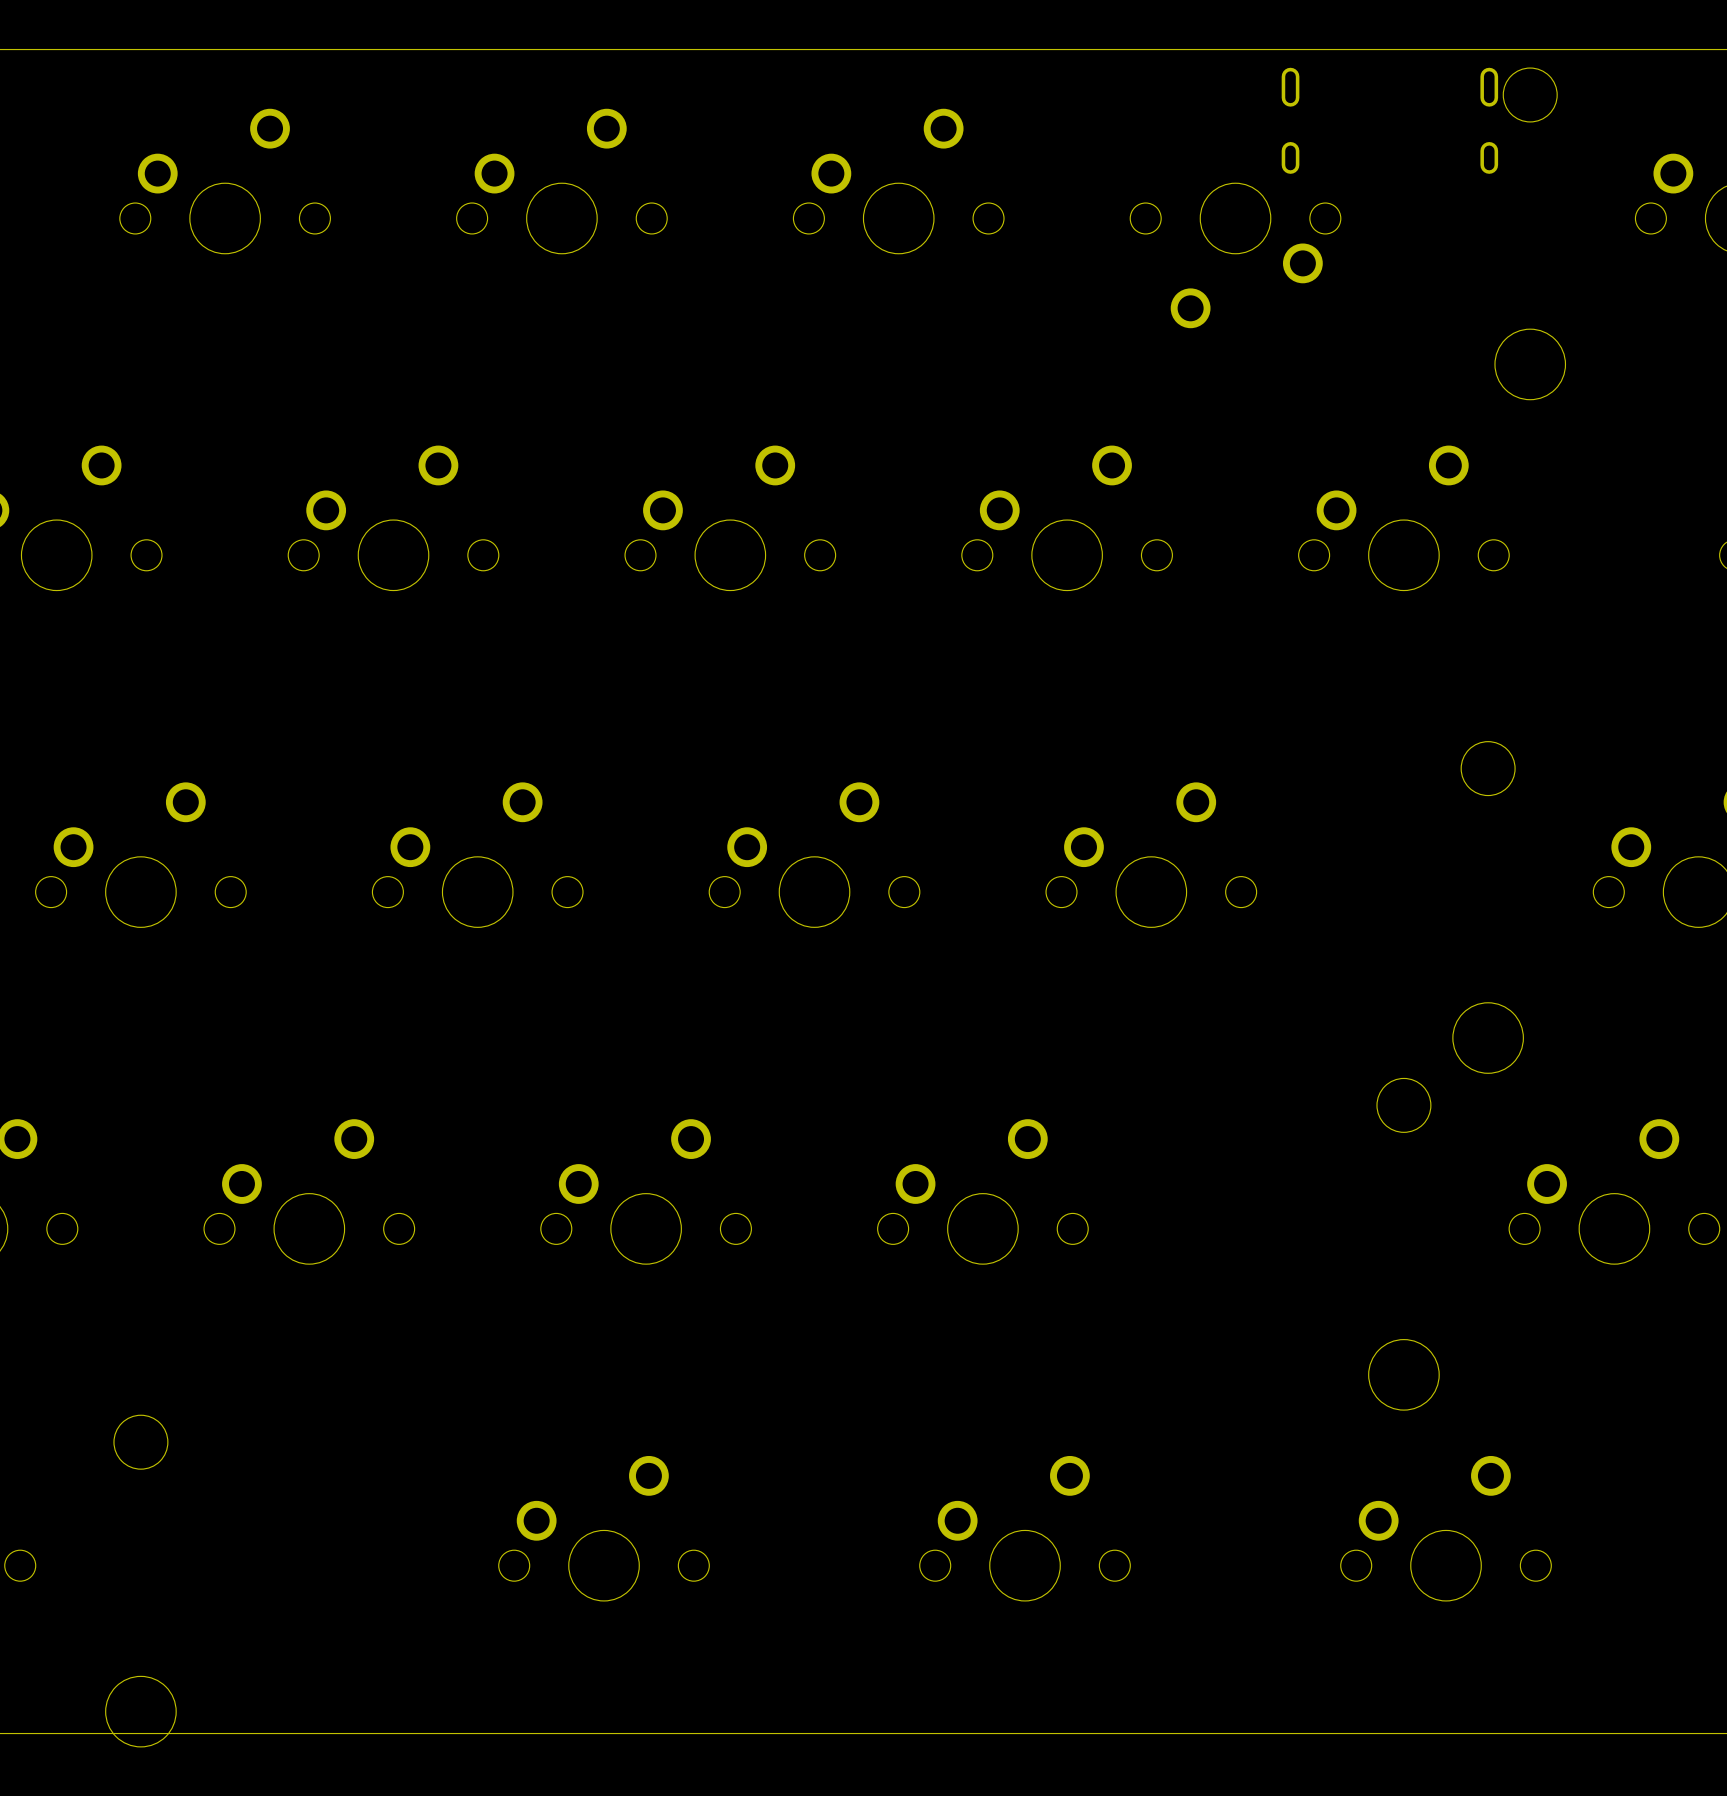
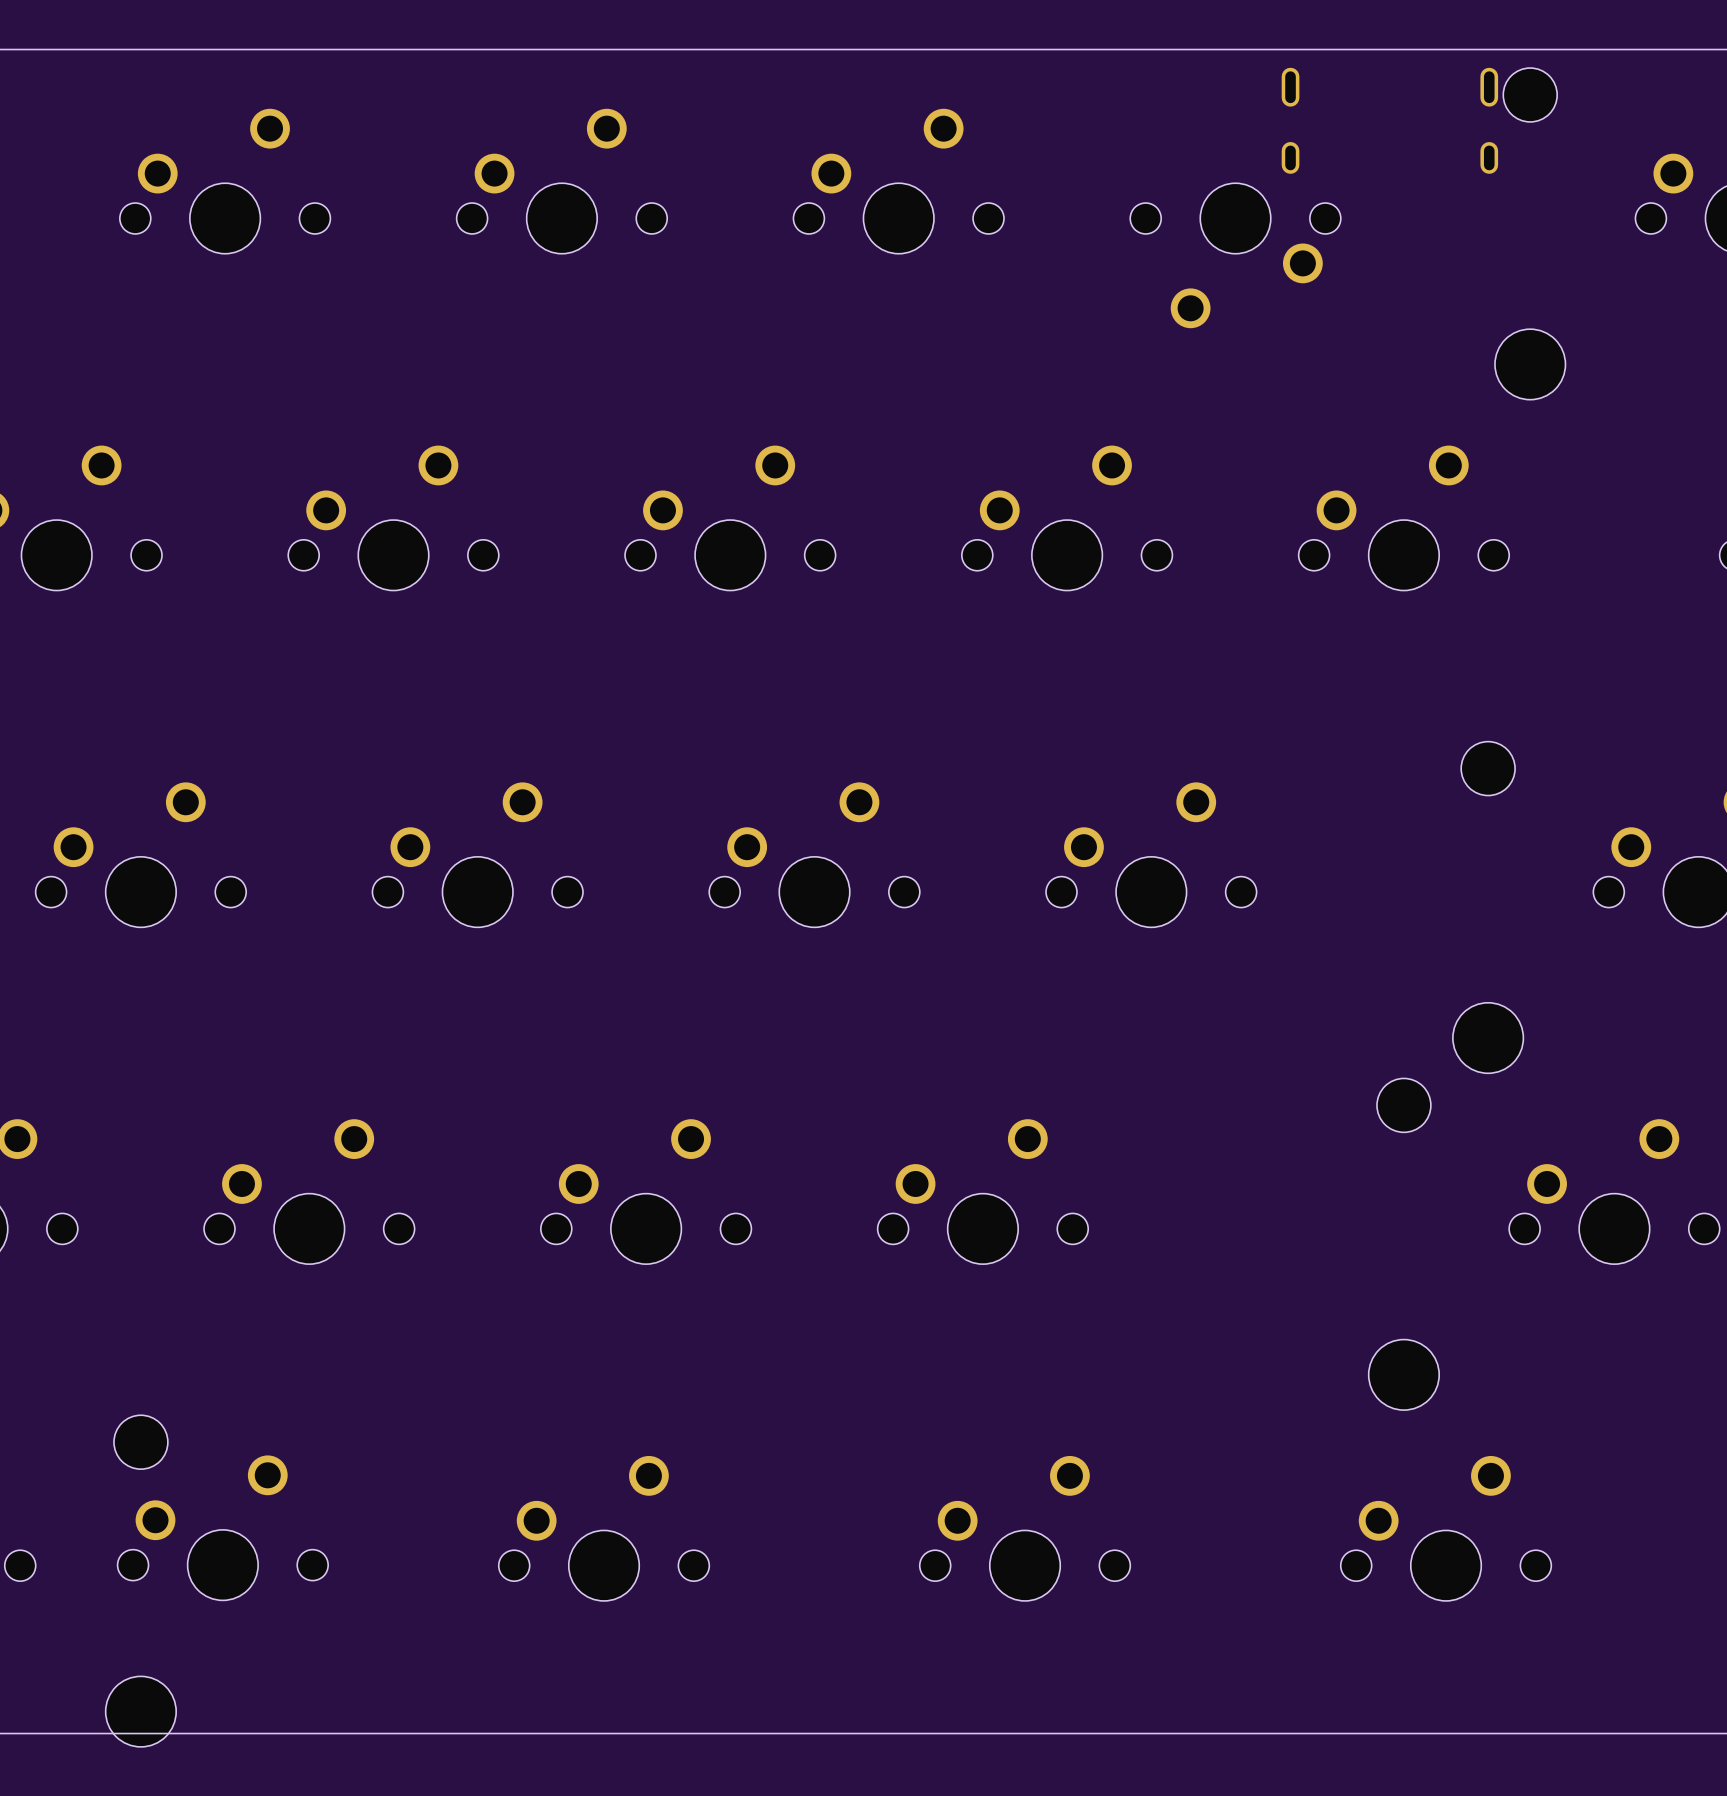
part: none -> (222, 1527)

